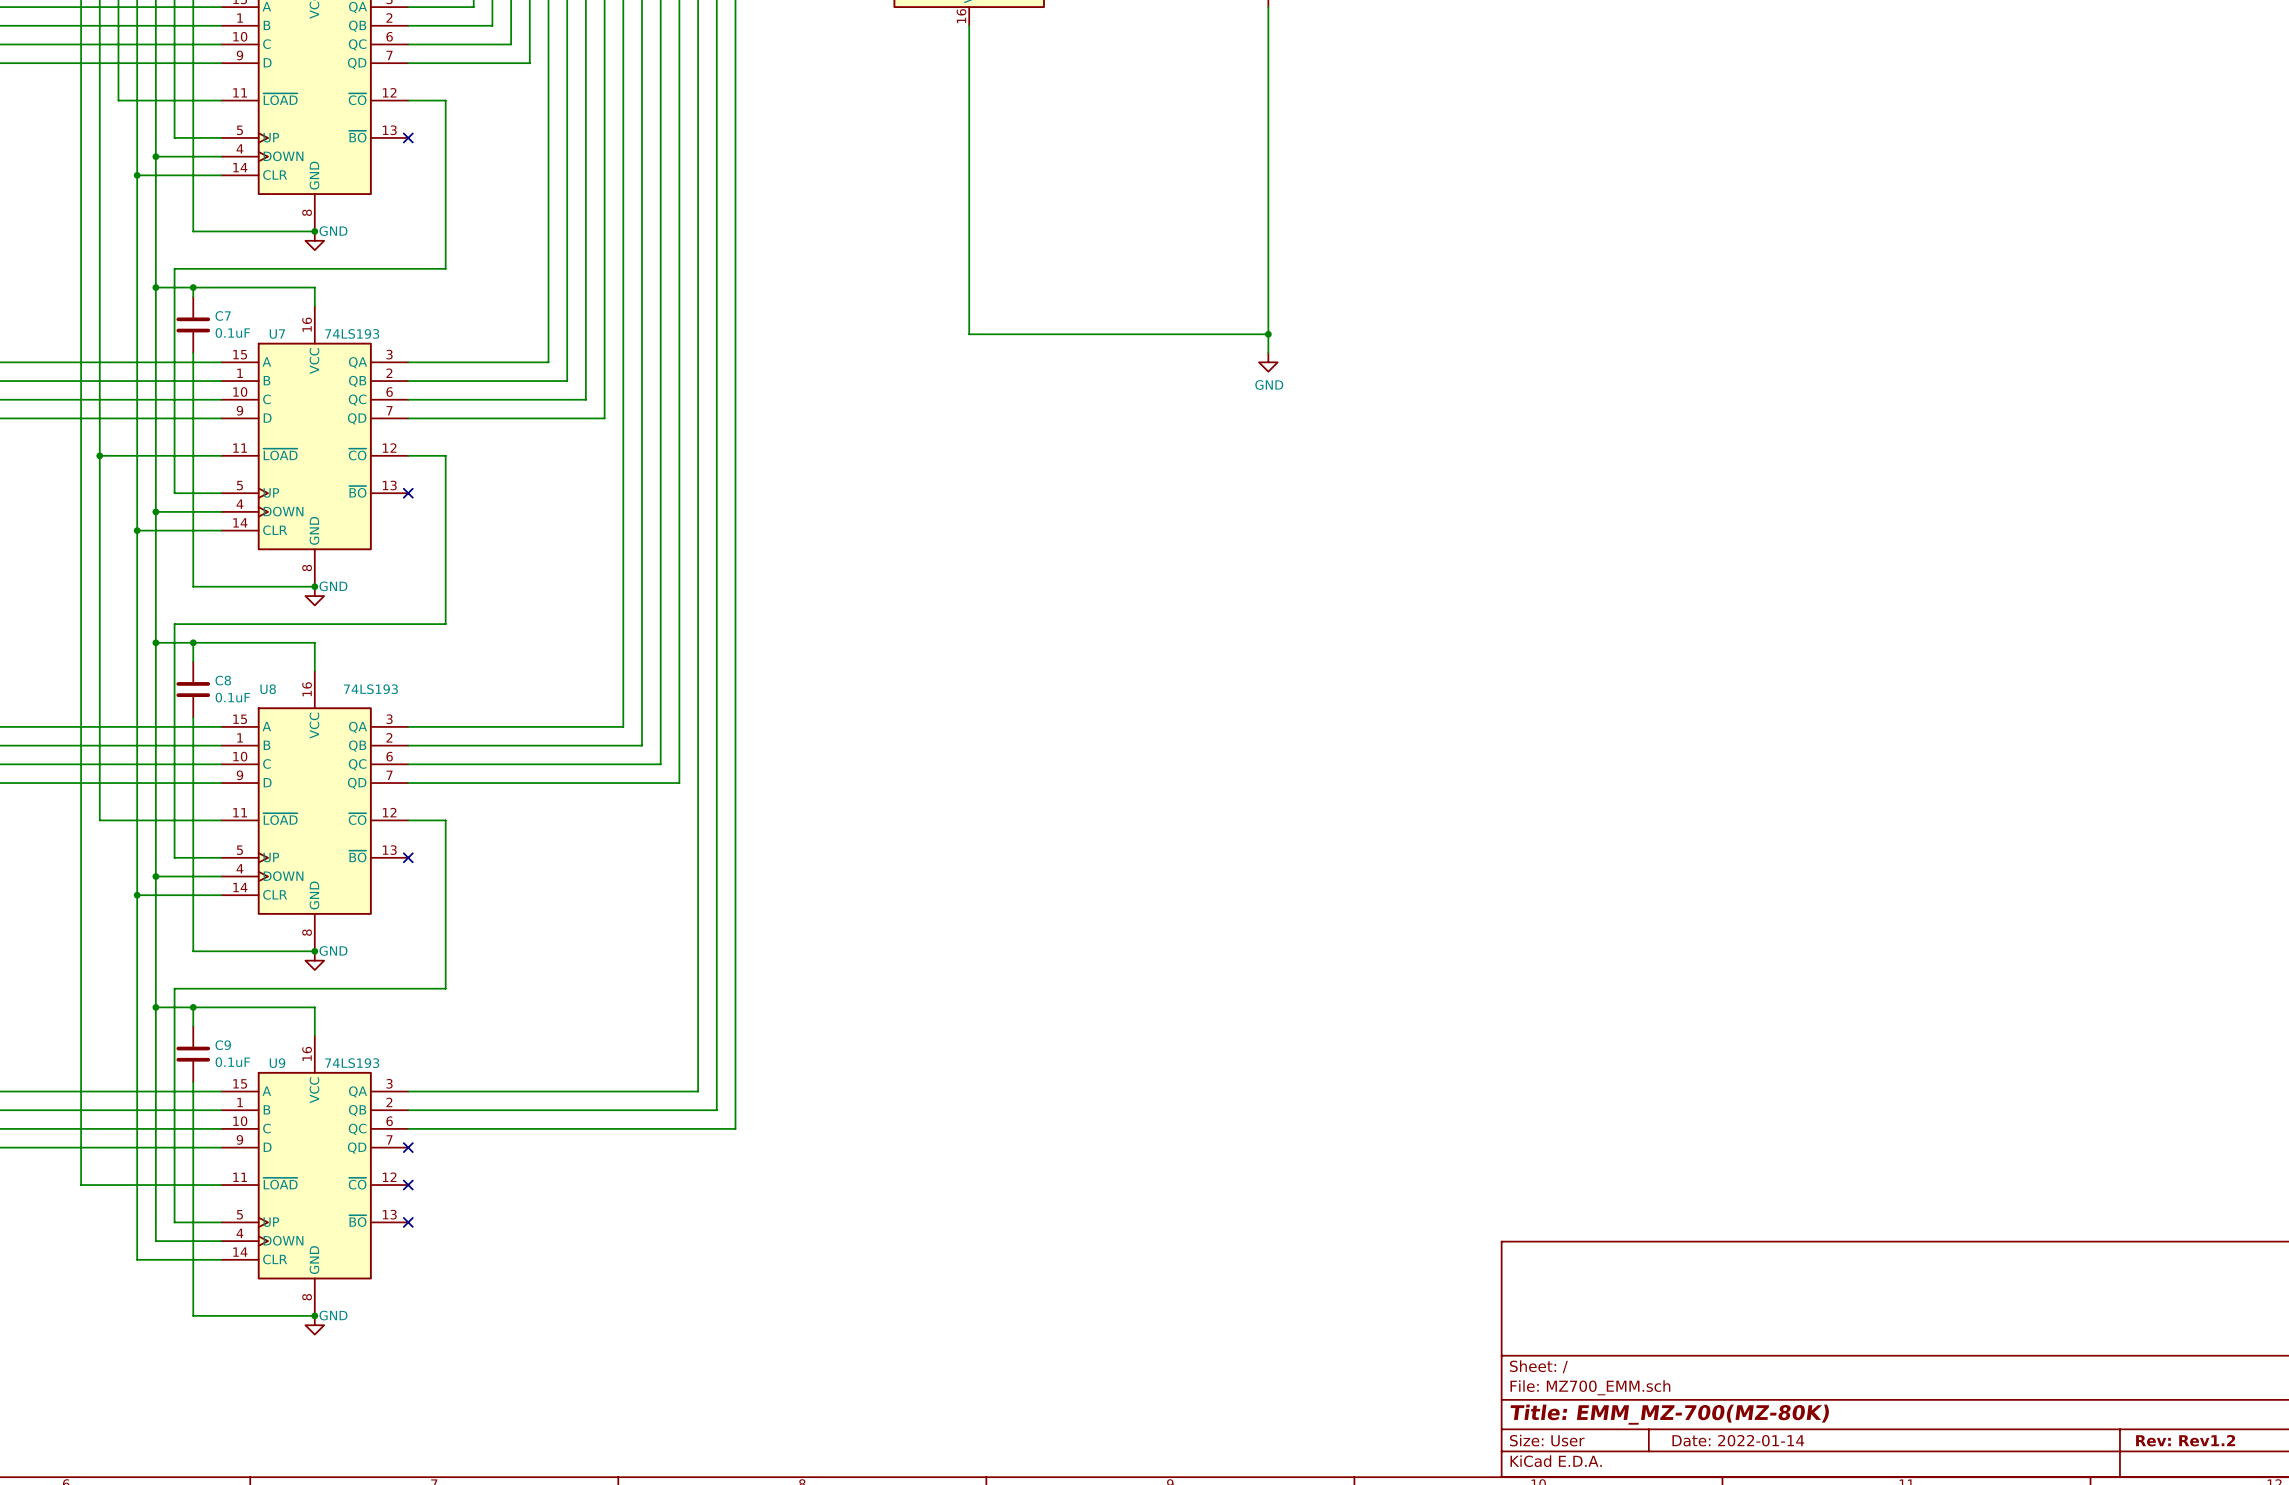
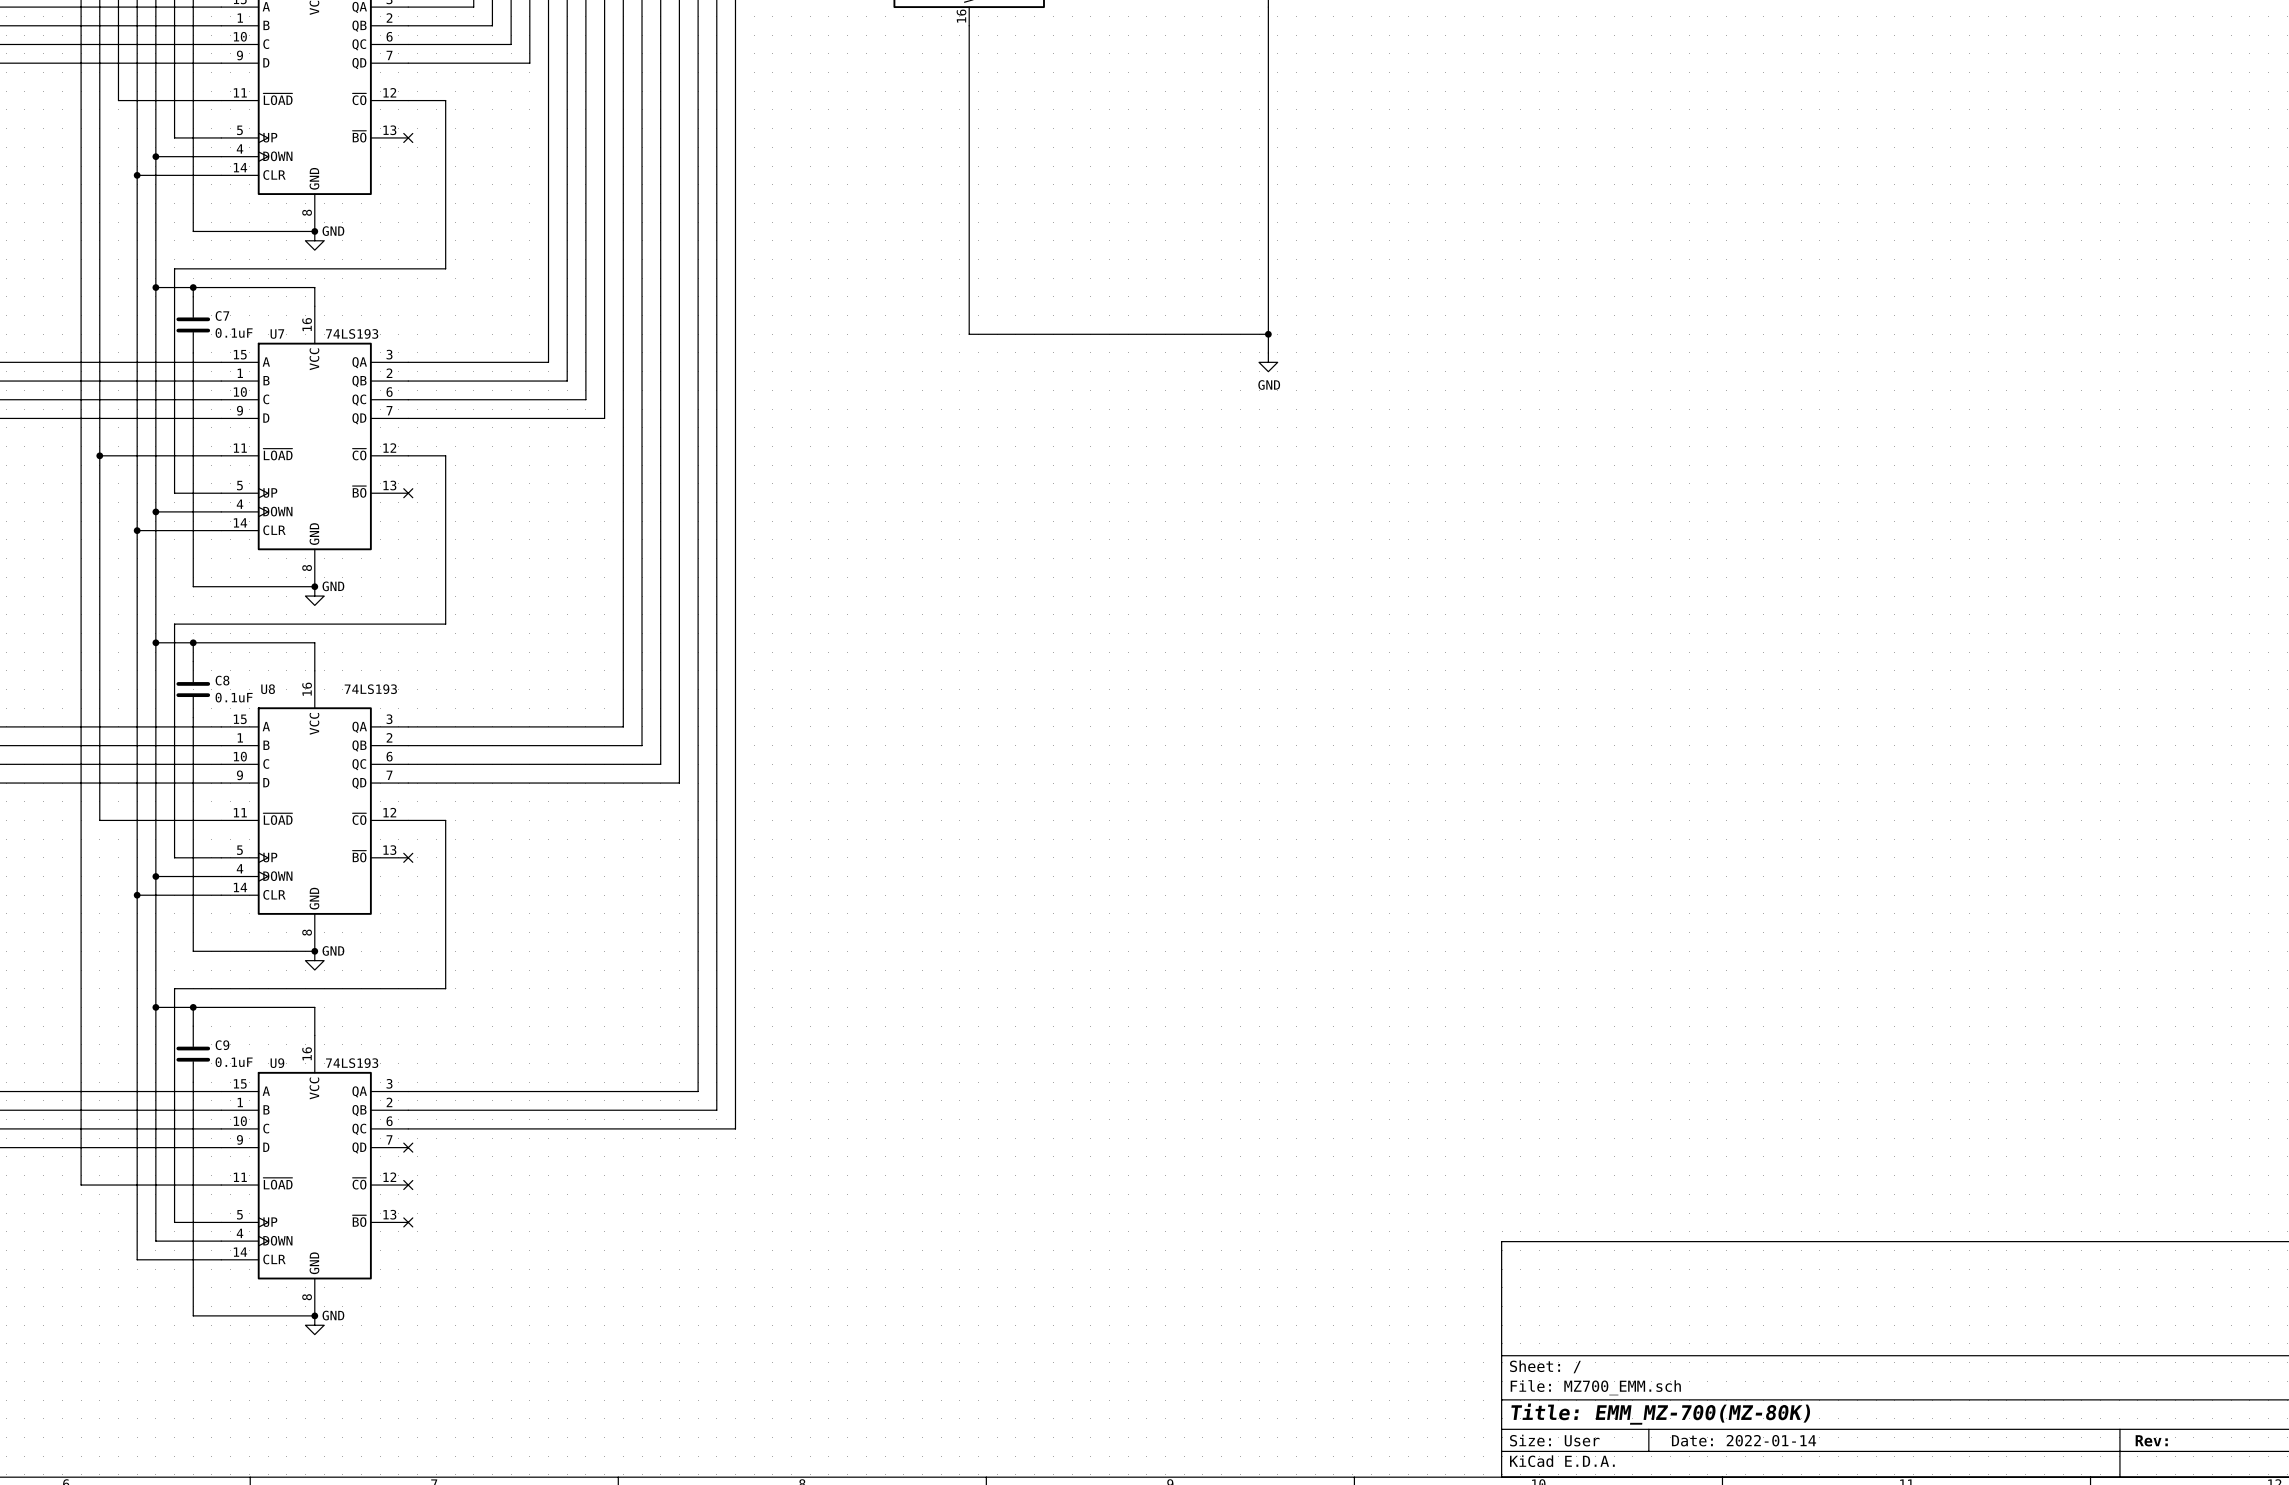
title block: Rev: Rev1.2 (2185, 1440) -> Rev: (2151, 1440)

